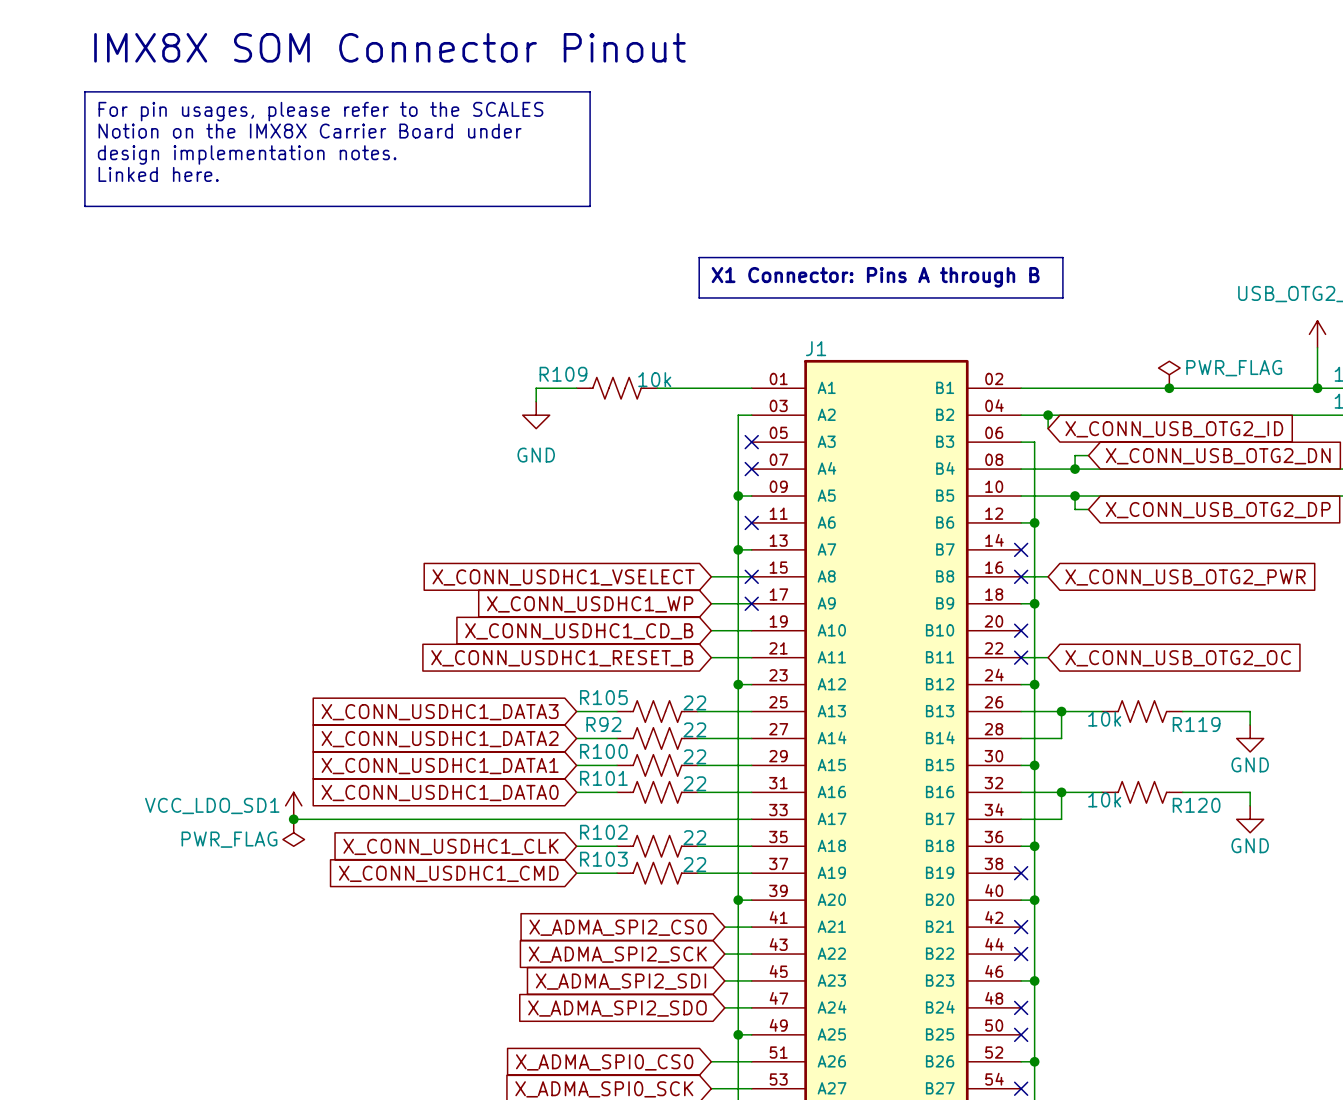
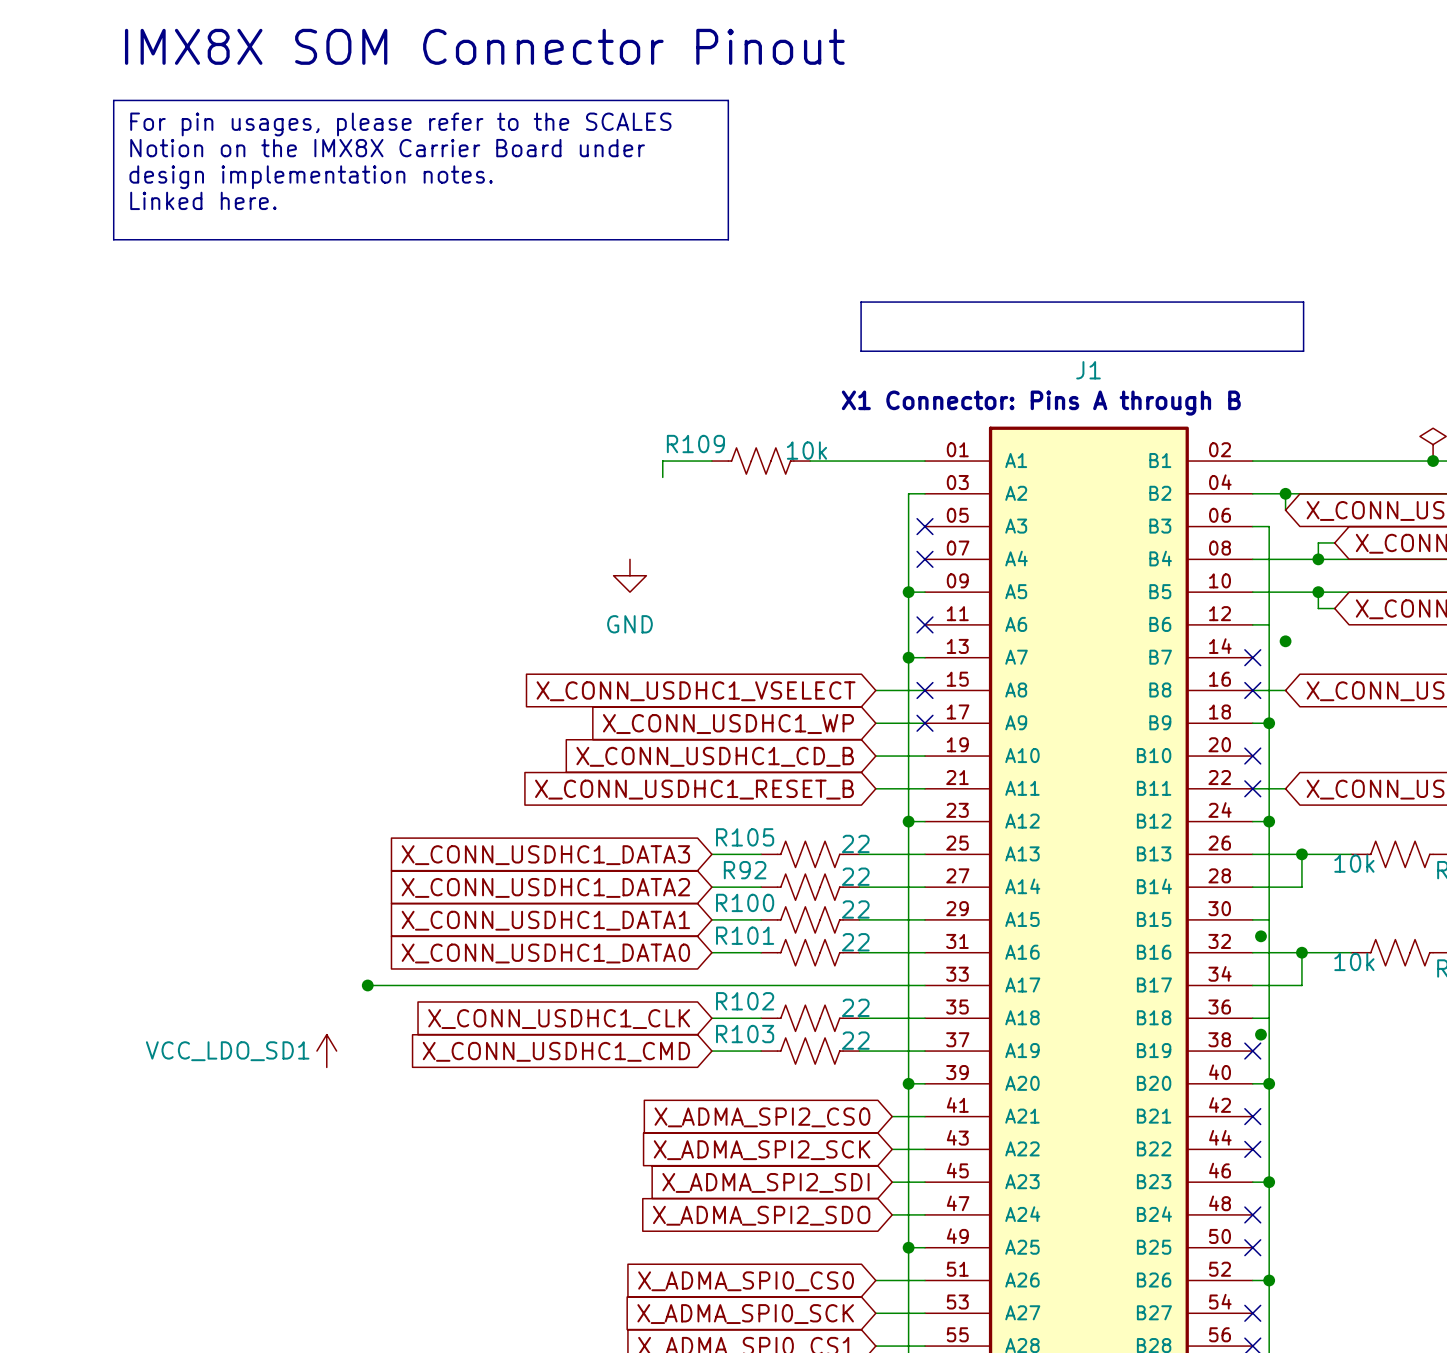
text position: X1 Connector: Pins A through B (875, 277) -> X1 Connector: Pins A through B (1041, 403)
J1 name position: J1 (816, 348) -> J1 (1088, 370)
power symbol position: GND (536, 415) -> GND (629, 575)
junction position: (1034, 522) -> (1285, 641)
junction position: (1034, 765) -> (1260, 936)
power symbol position: VCC_LDO_SD1 (293, 805) -> VCC_LDO_SD1 (326, 1051)
power symbol: PWR_FLAG (293, 832) -> none
junction position: (1034, 846) -> (1260, 1034)

